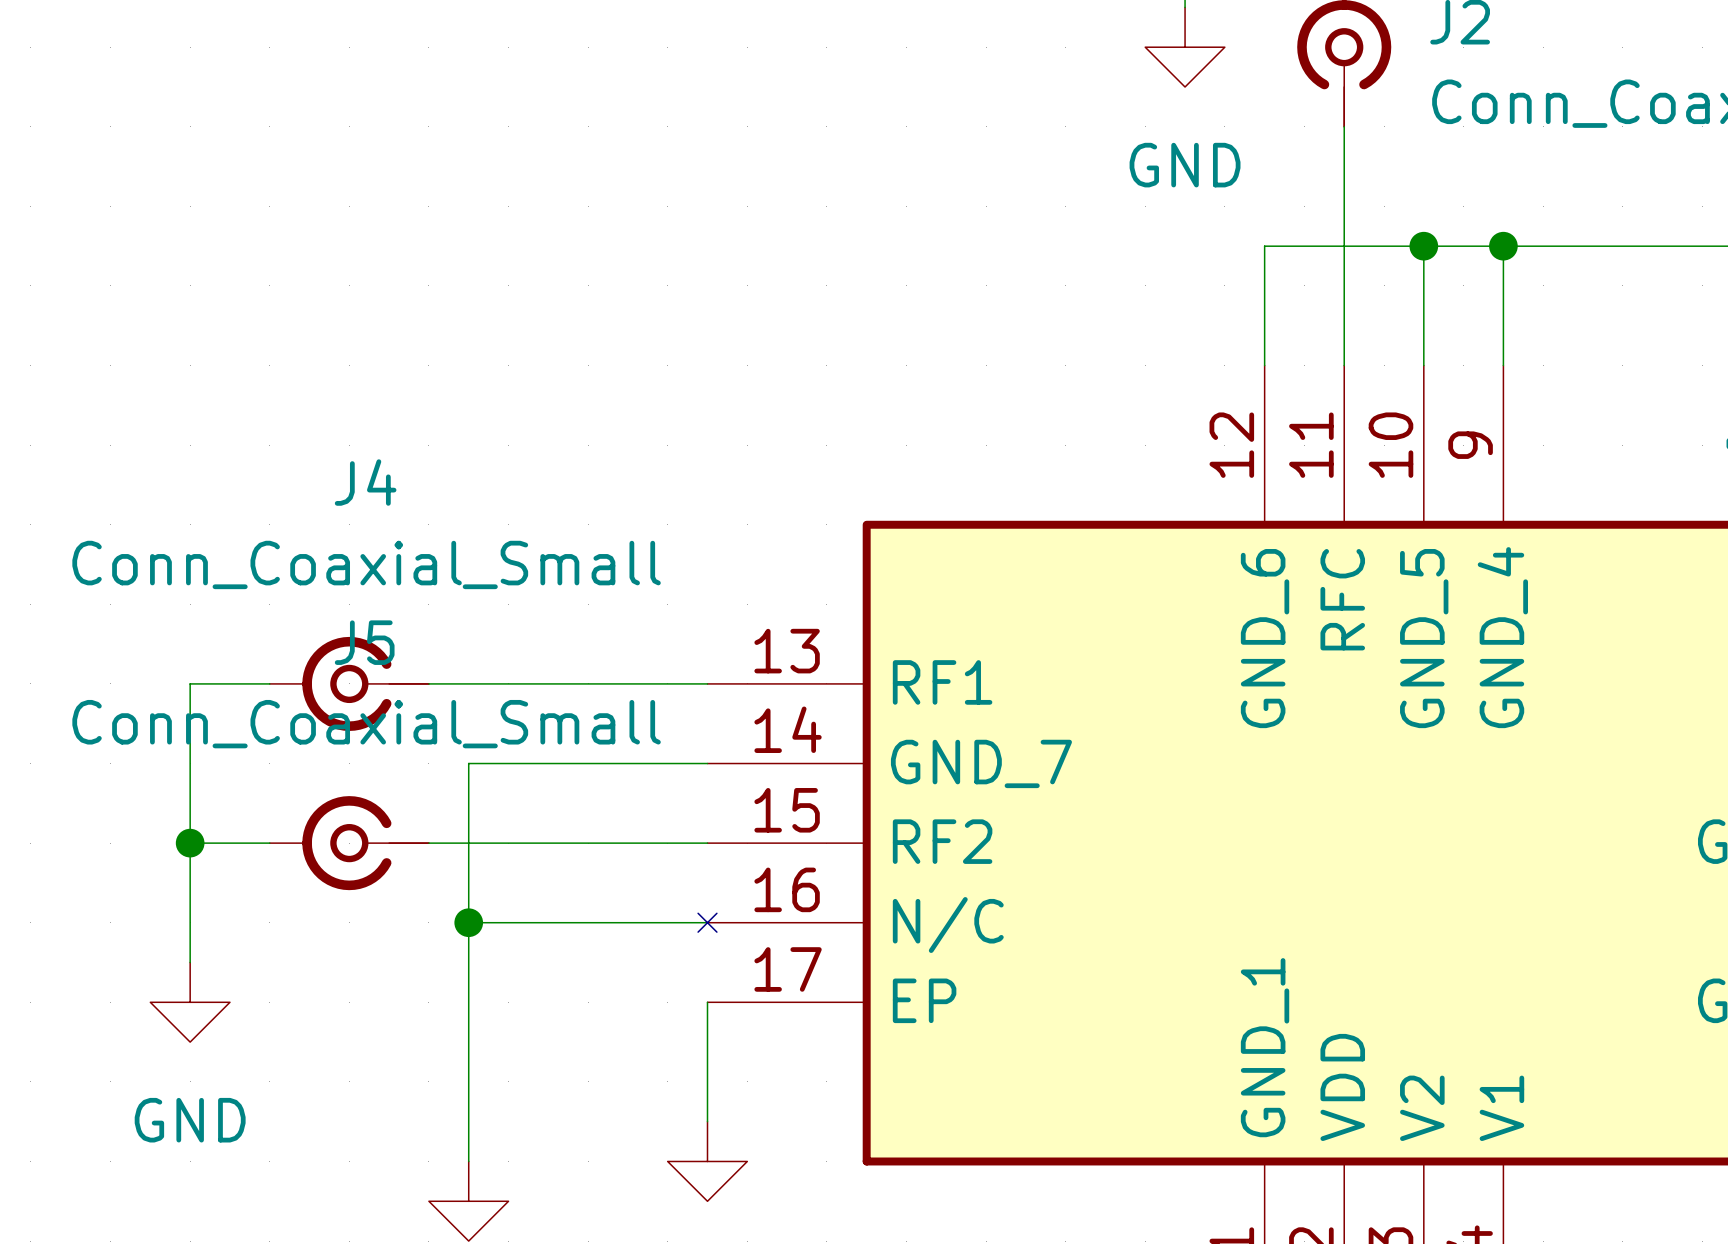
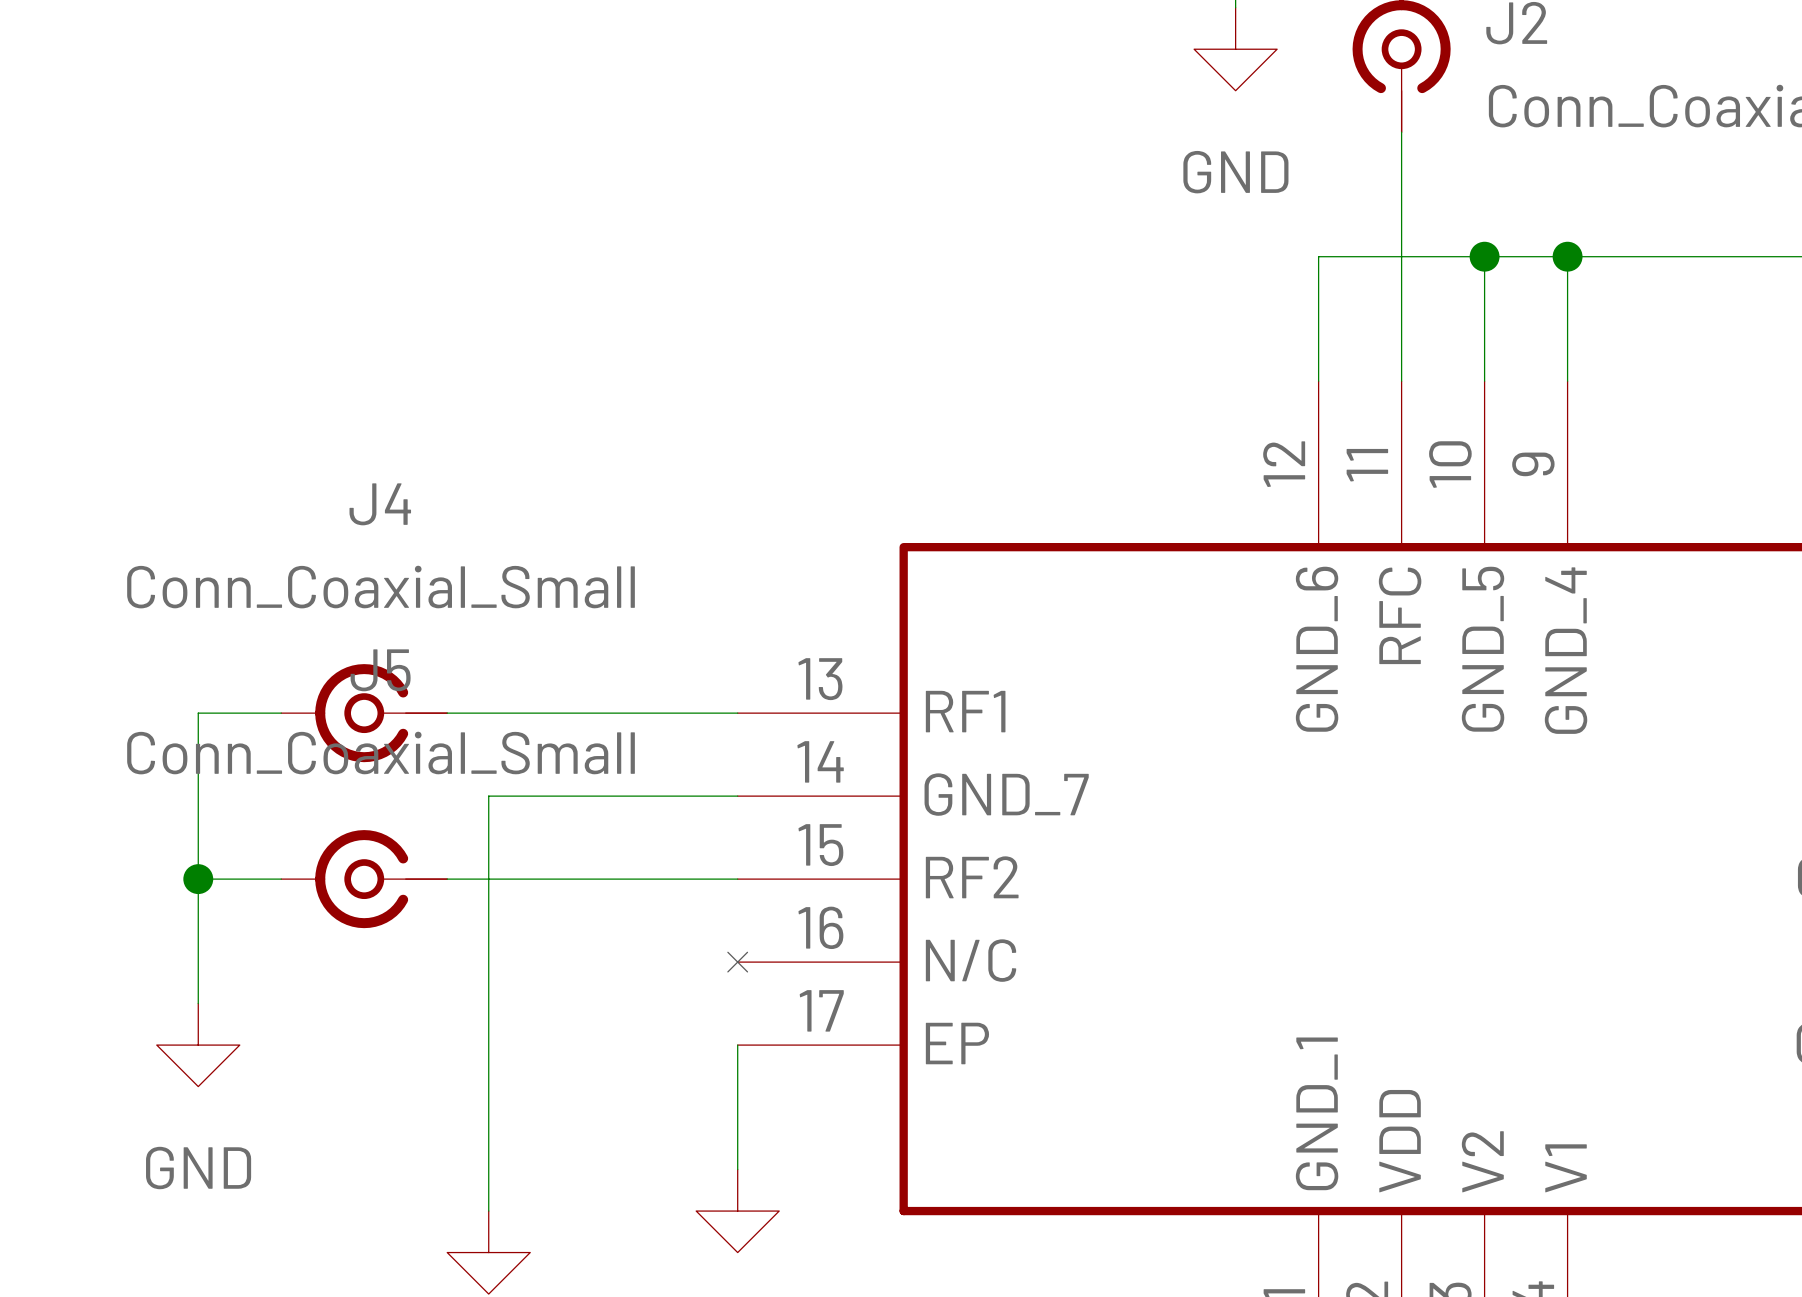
wire: (468, 922) (707, 922) -> none
junction: (468, 922) -> none

